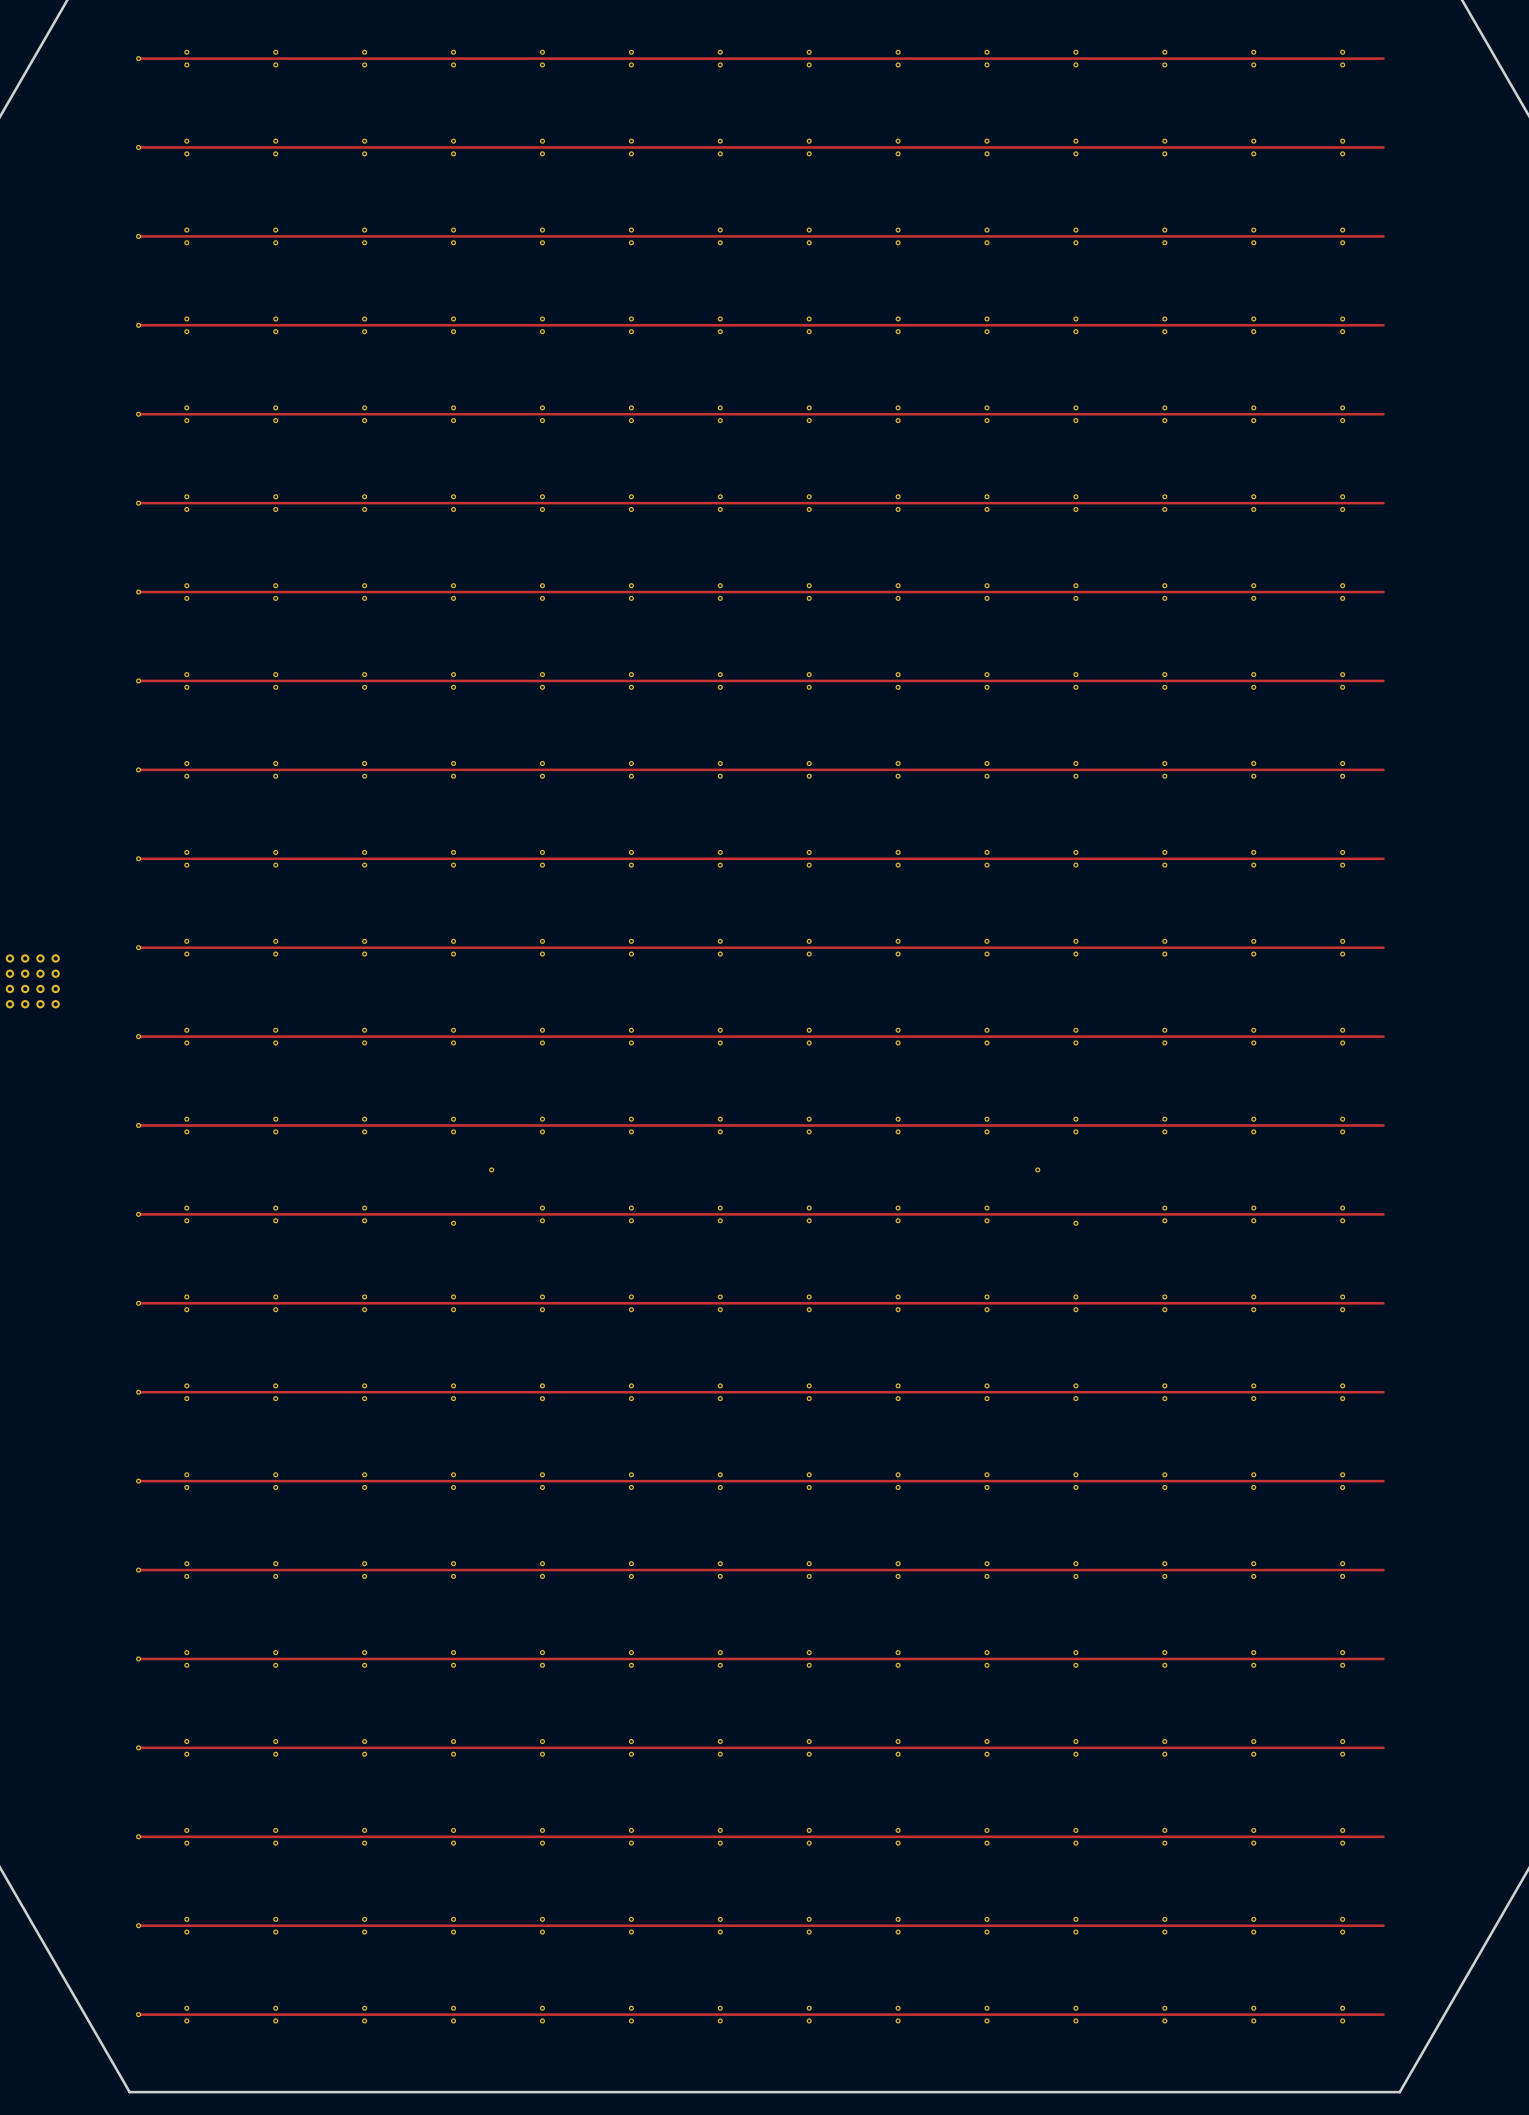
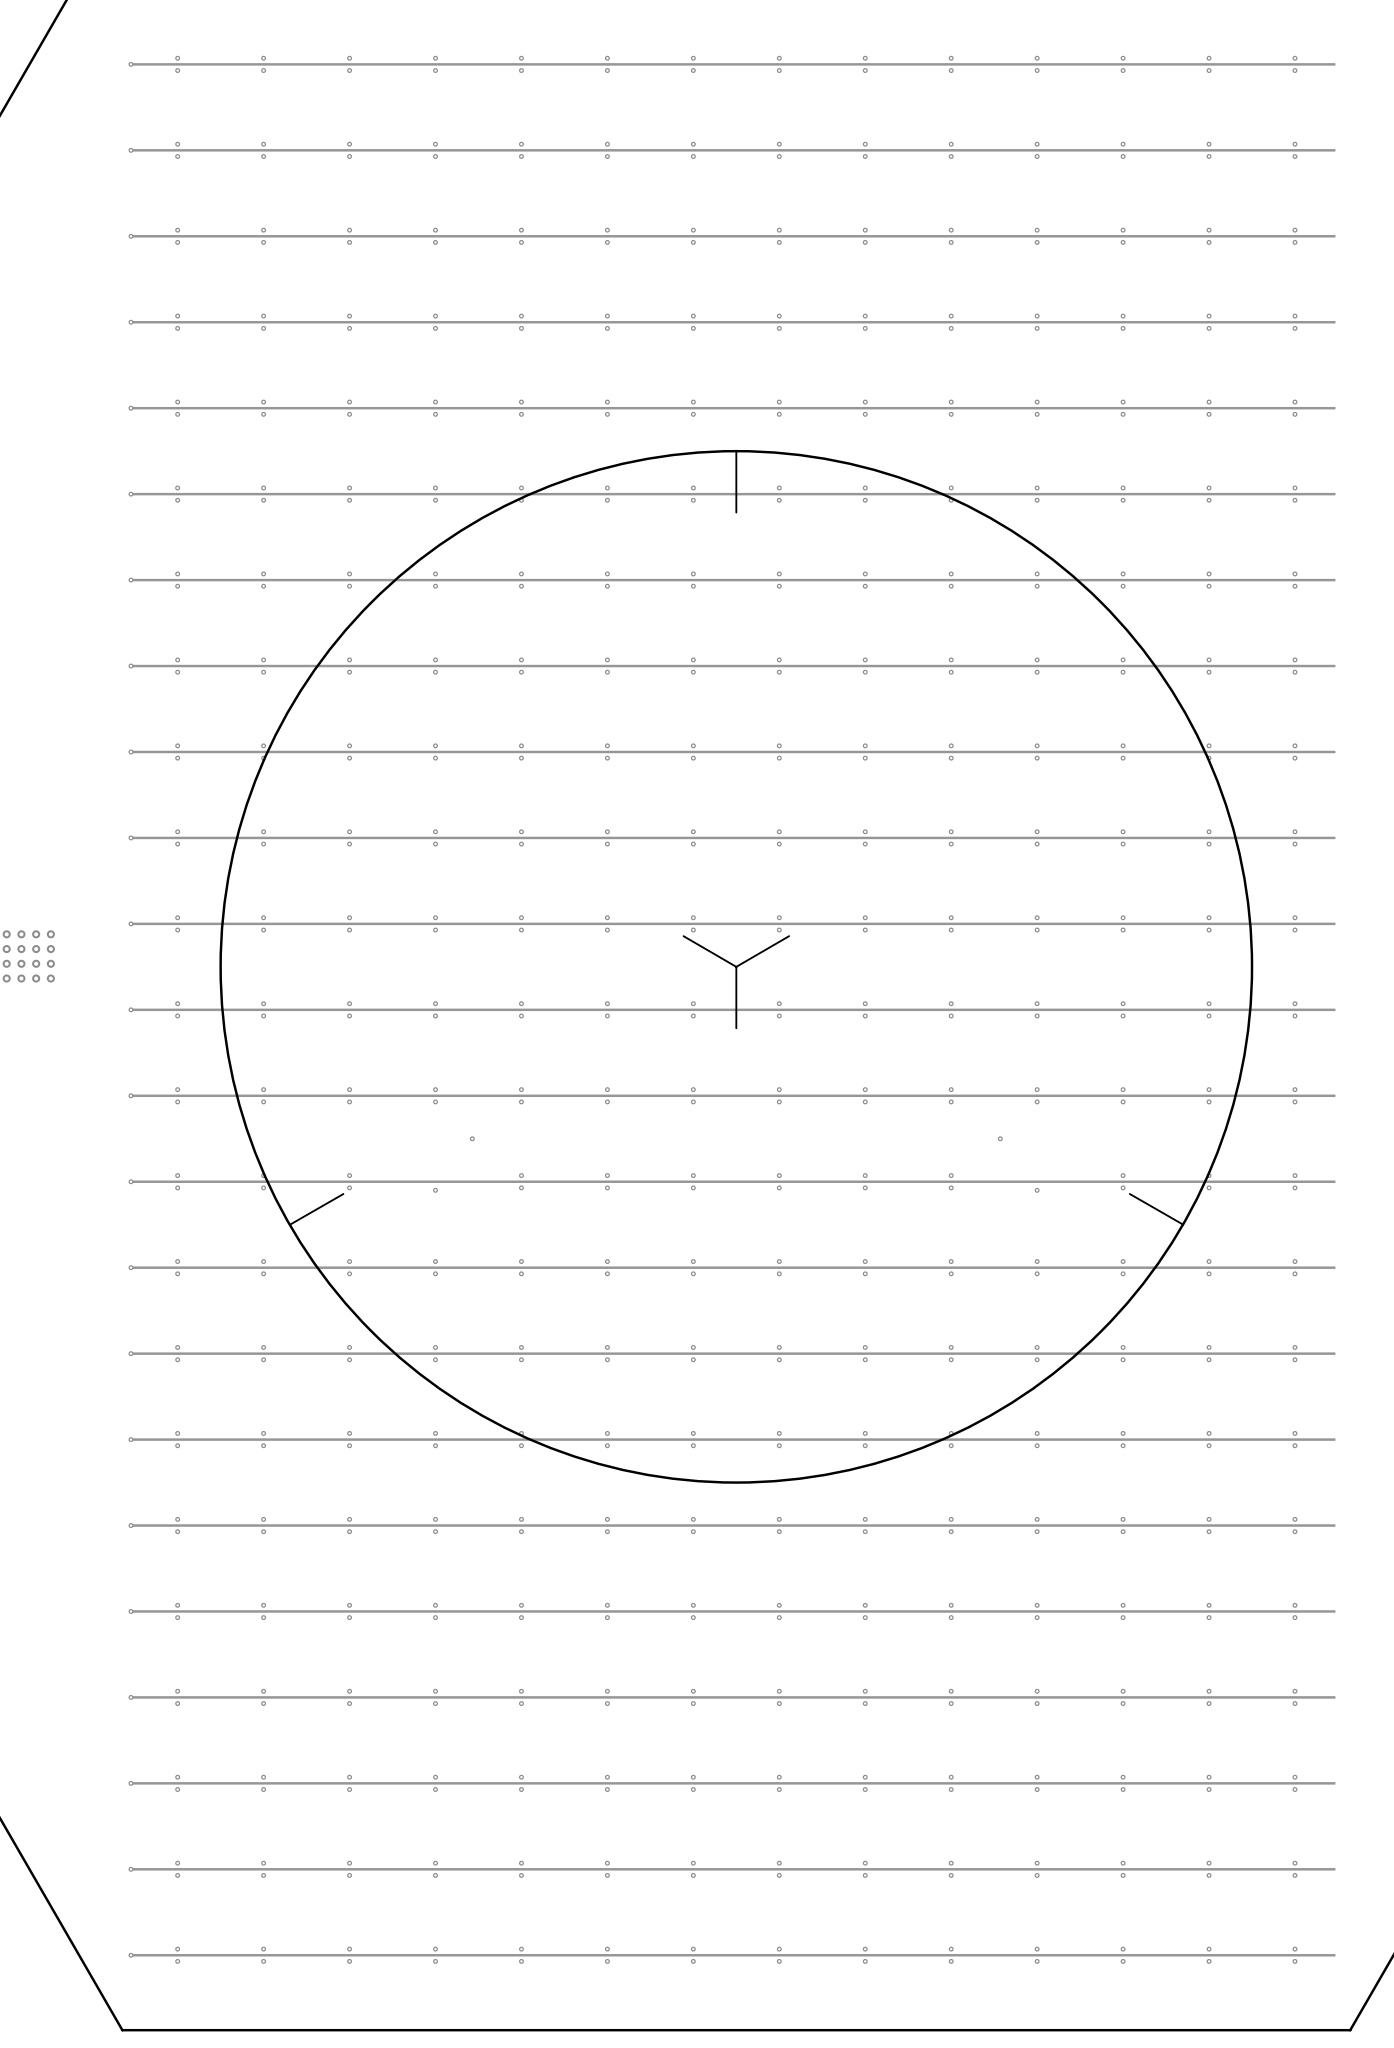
drawing: none -> [219, 449, 1254, 1484]
line: none -> (736, 451) (736, 512)
line: none -> (683, 936) (736, 966)
line: none -> (789, 936) (736, 966)
line: none -> (736, 966) (736, 1028)
line: none -> (343, 1194) (290, 1224)
line: none -> (1129, 1194) (1183, 1224)

